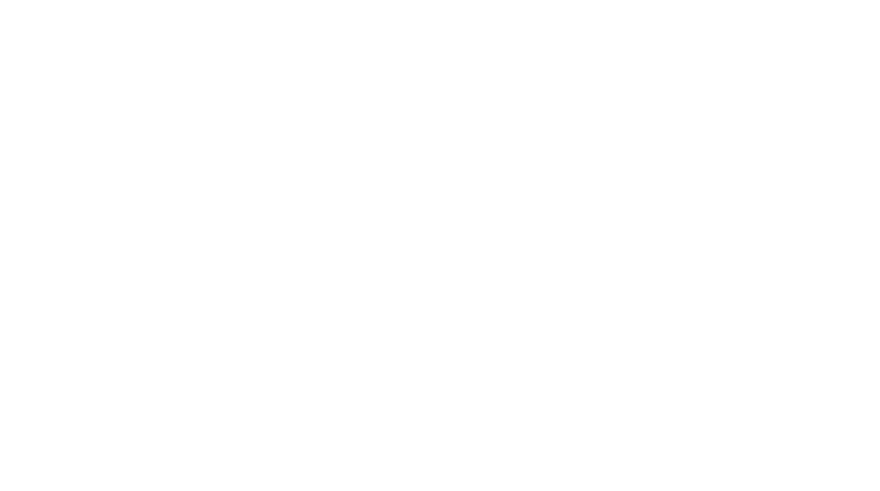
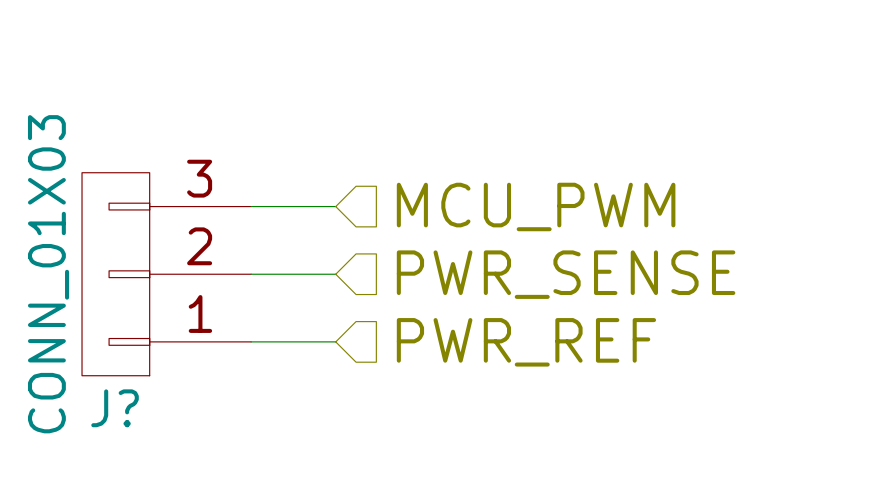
wire: none -> (251, 206) (335, 206)
hierarchical label: none -> MCU_PWM (536, 206)
J?: none -> CONN_01X03 (166, 274)
wire: none -> (251, 274) (335, 274)
hierarchical label: none -> PWR_SENSE (566, 274)
wire: none -> (251, 341) (335, 341)
hierarchical label: none -> PWR_REF (526, 342)

